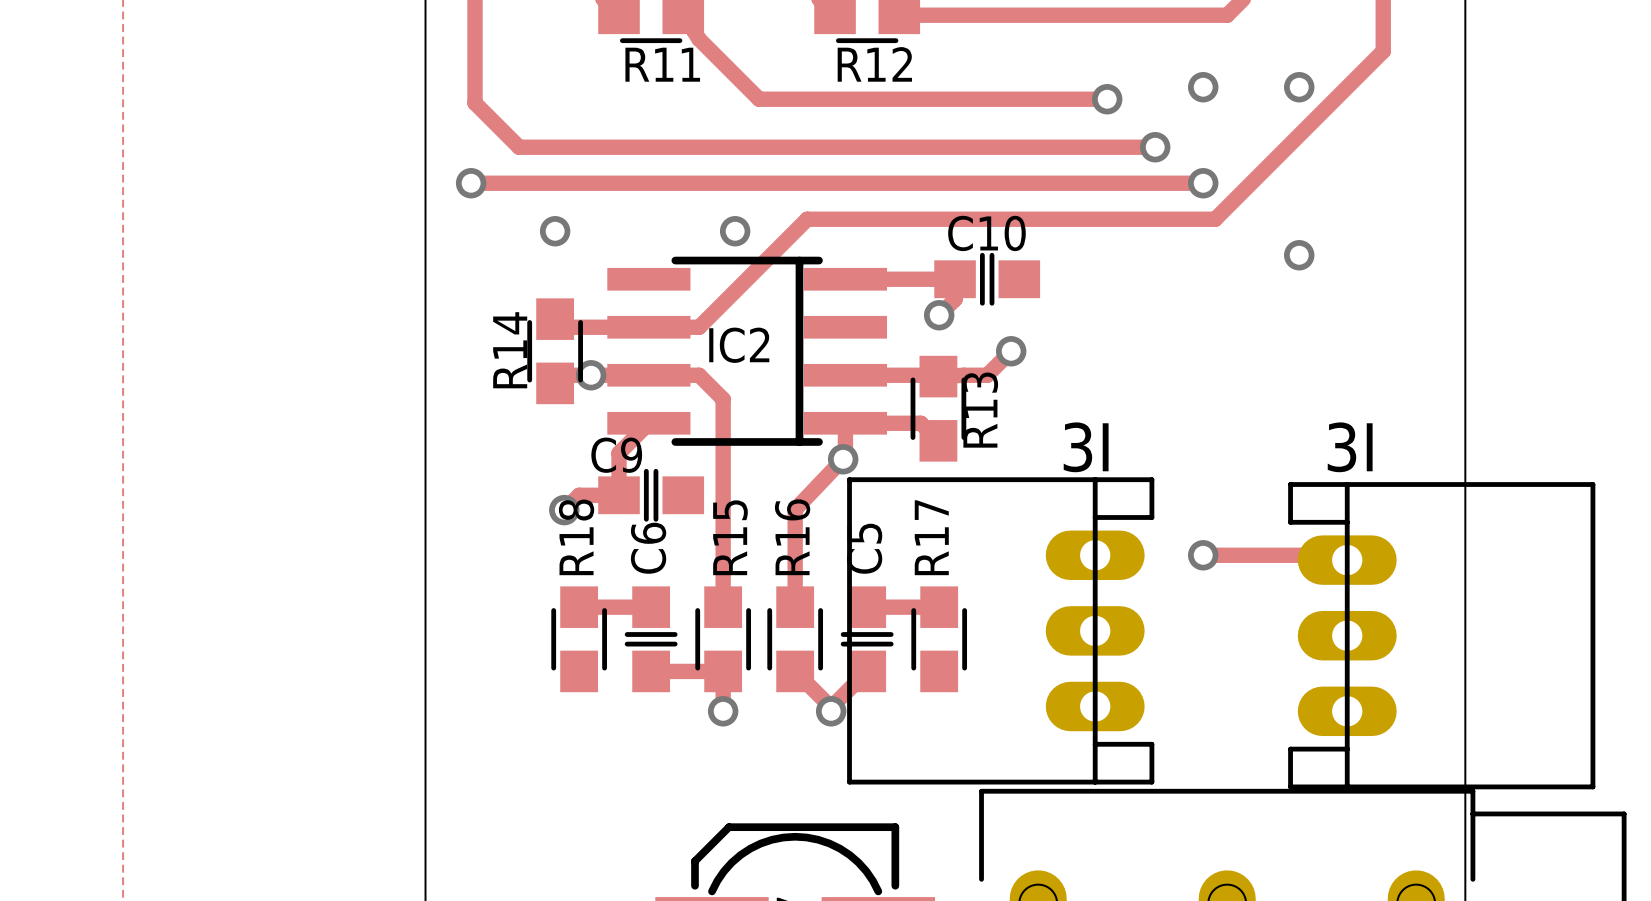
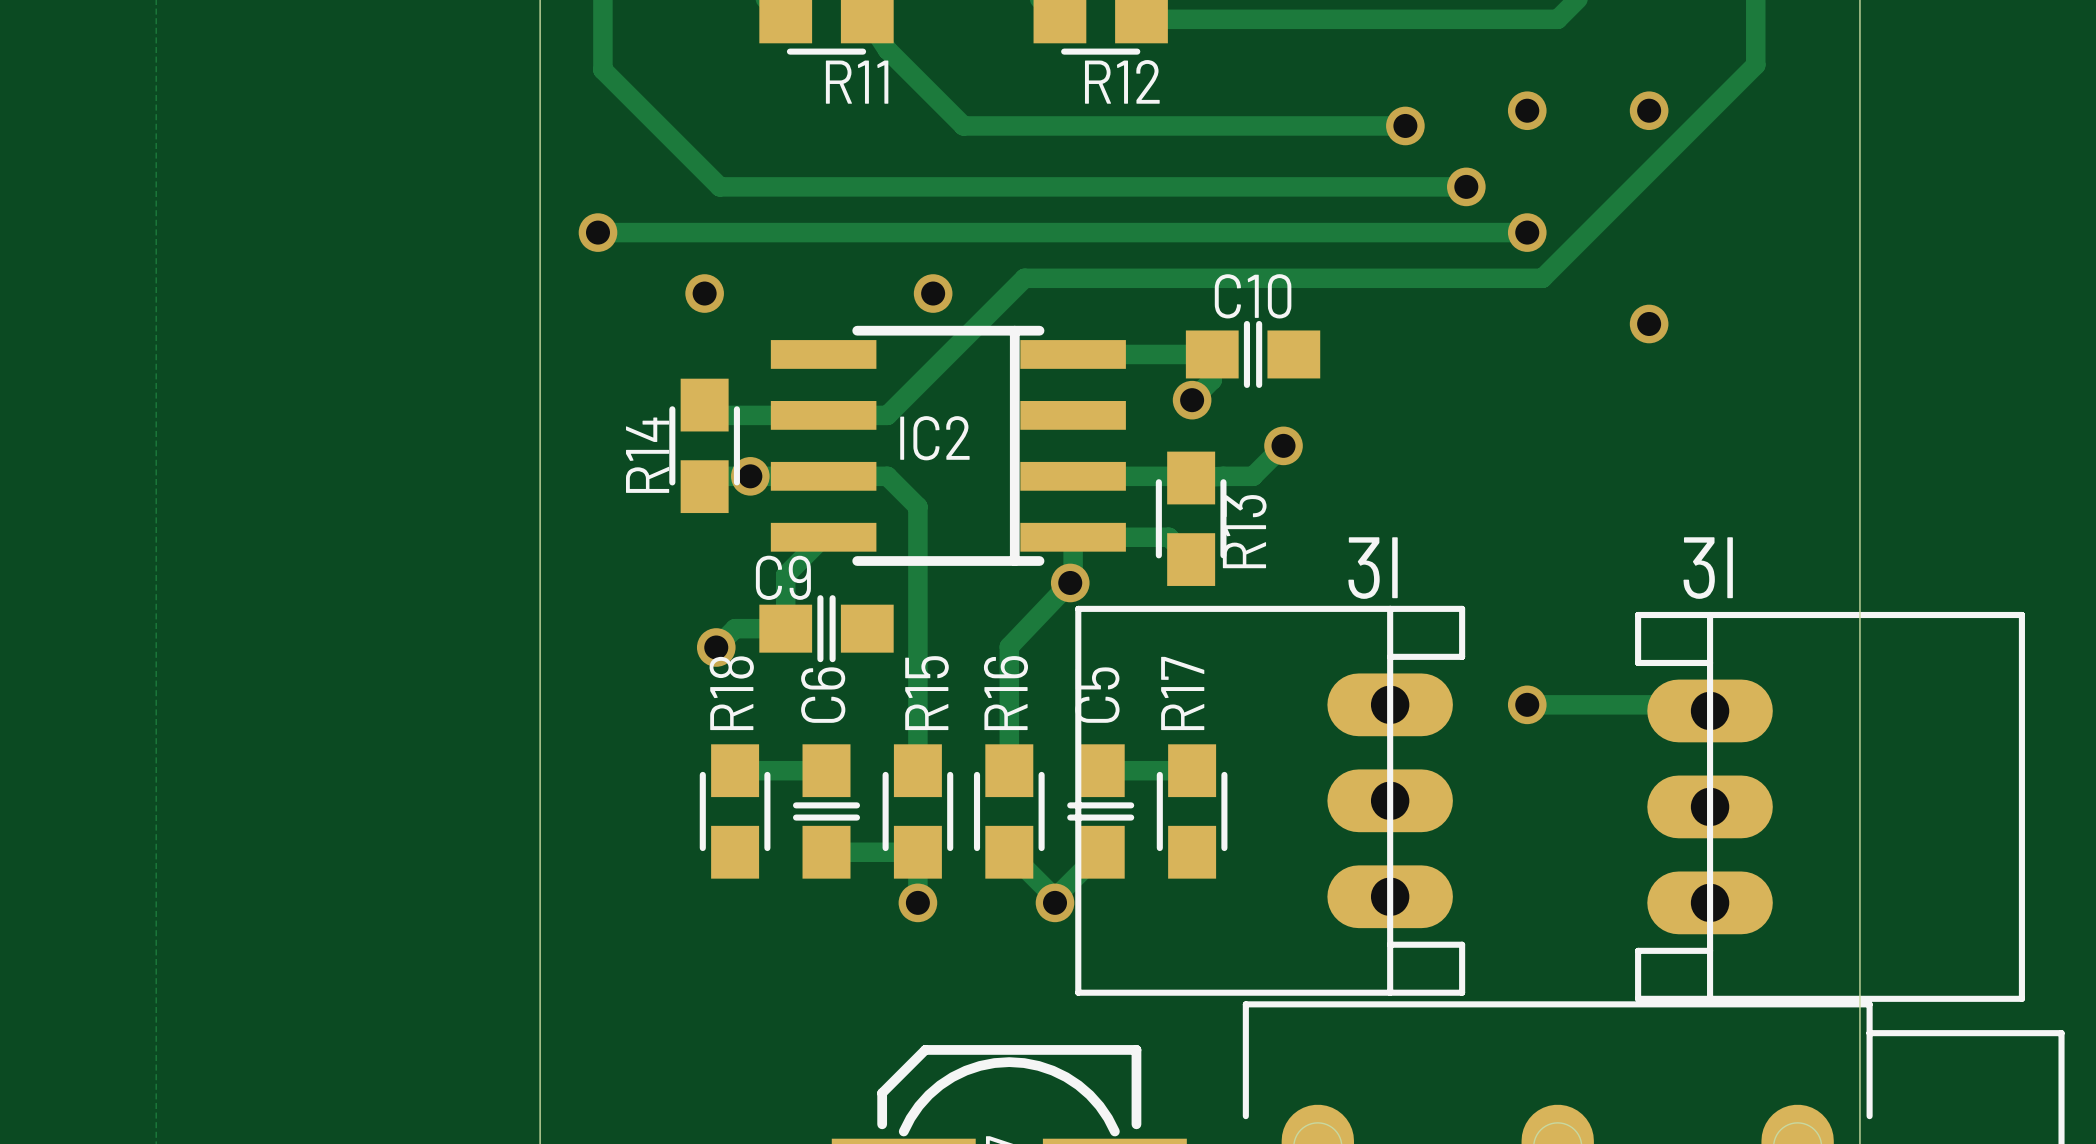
track: (474, 55) (474, 103) (519, 147) (567, 147) -> (602, 69) (719, 186)

